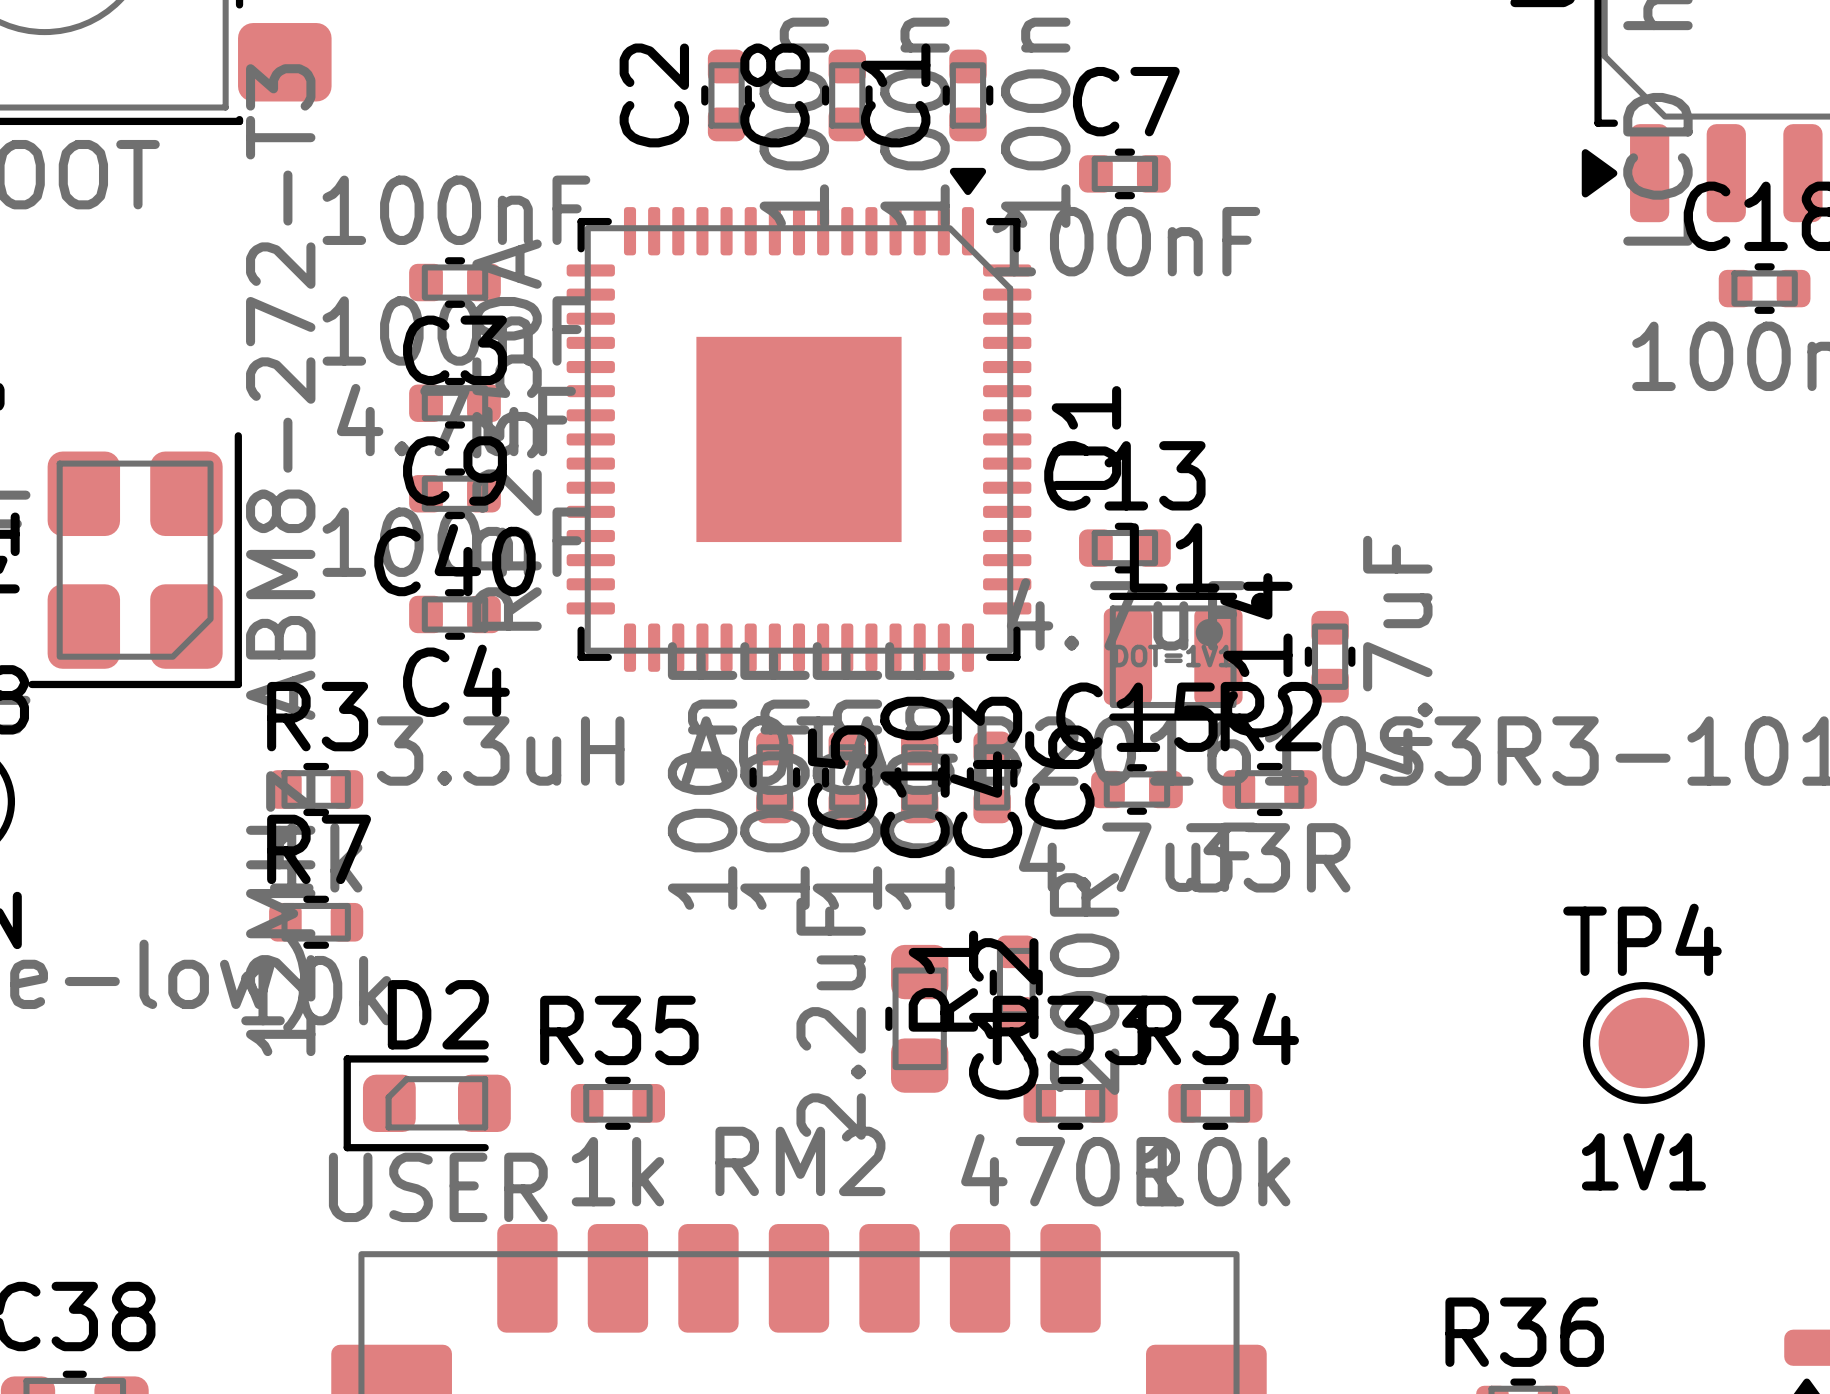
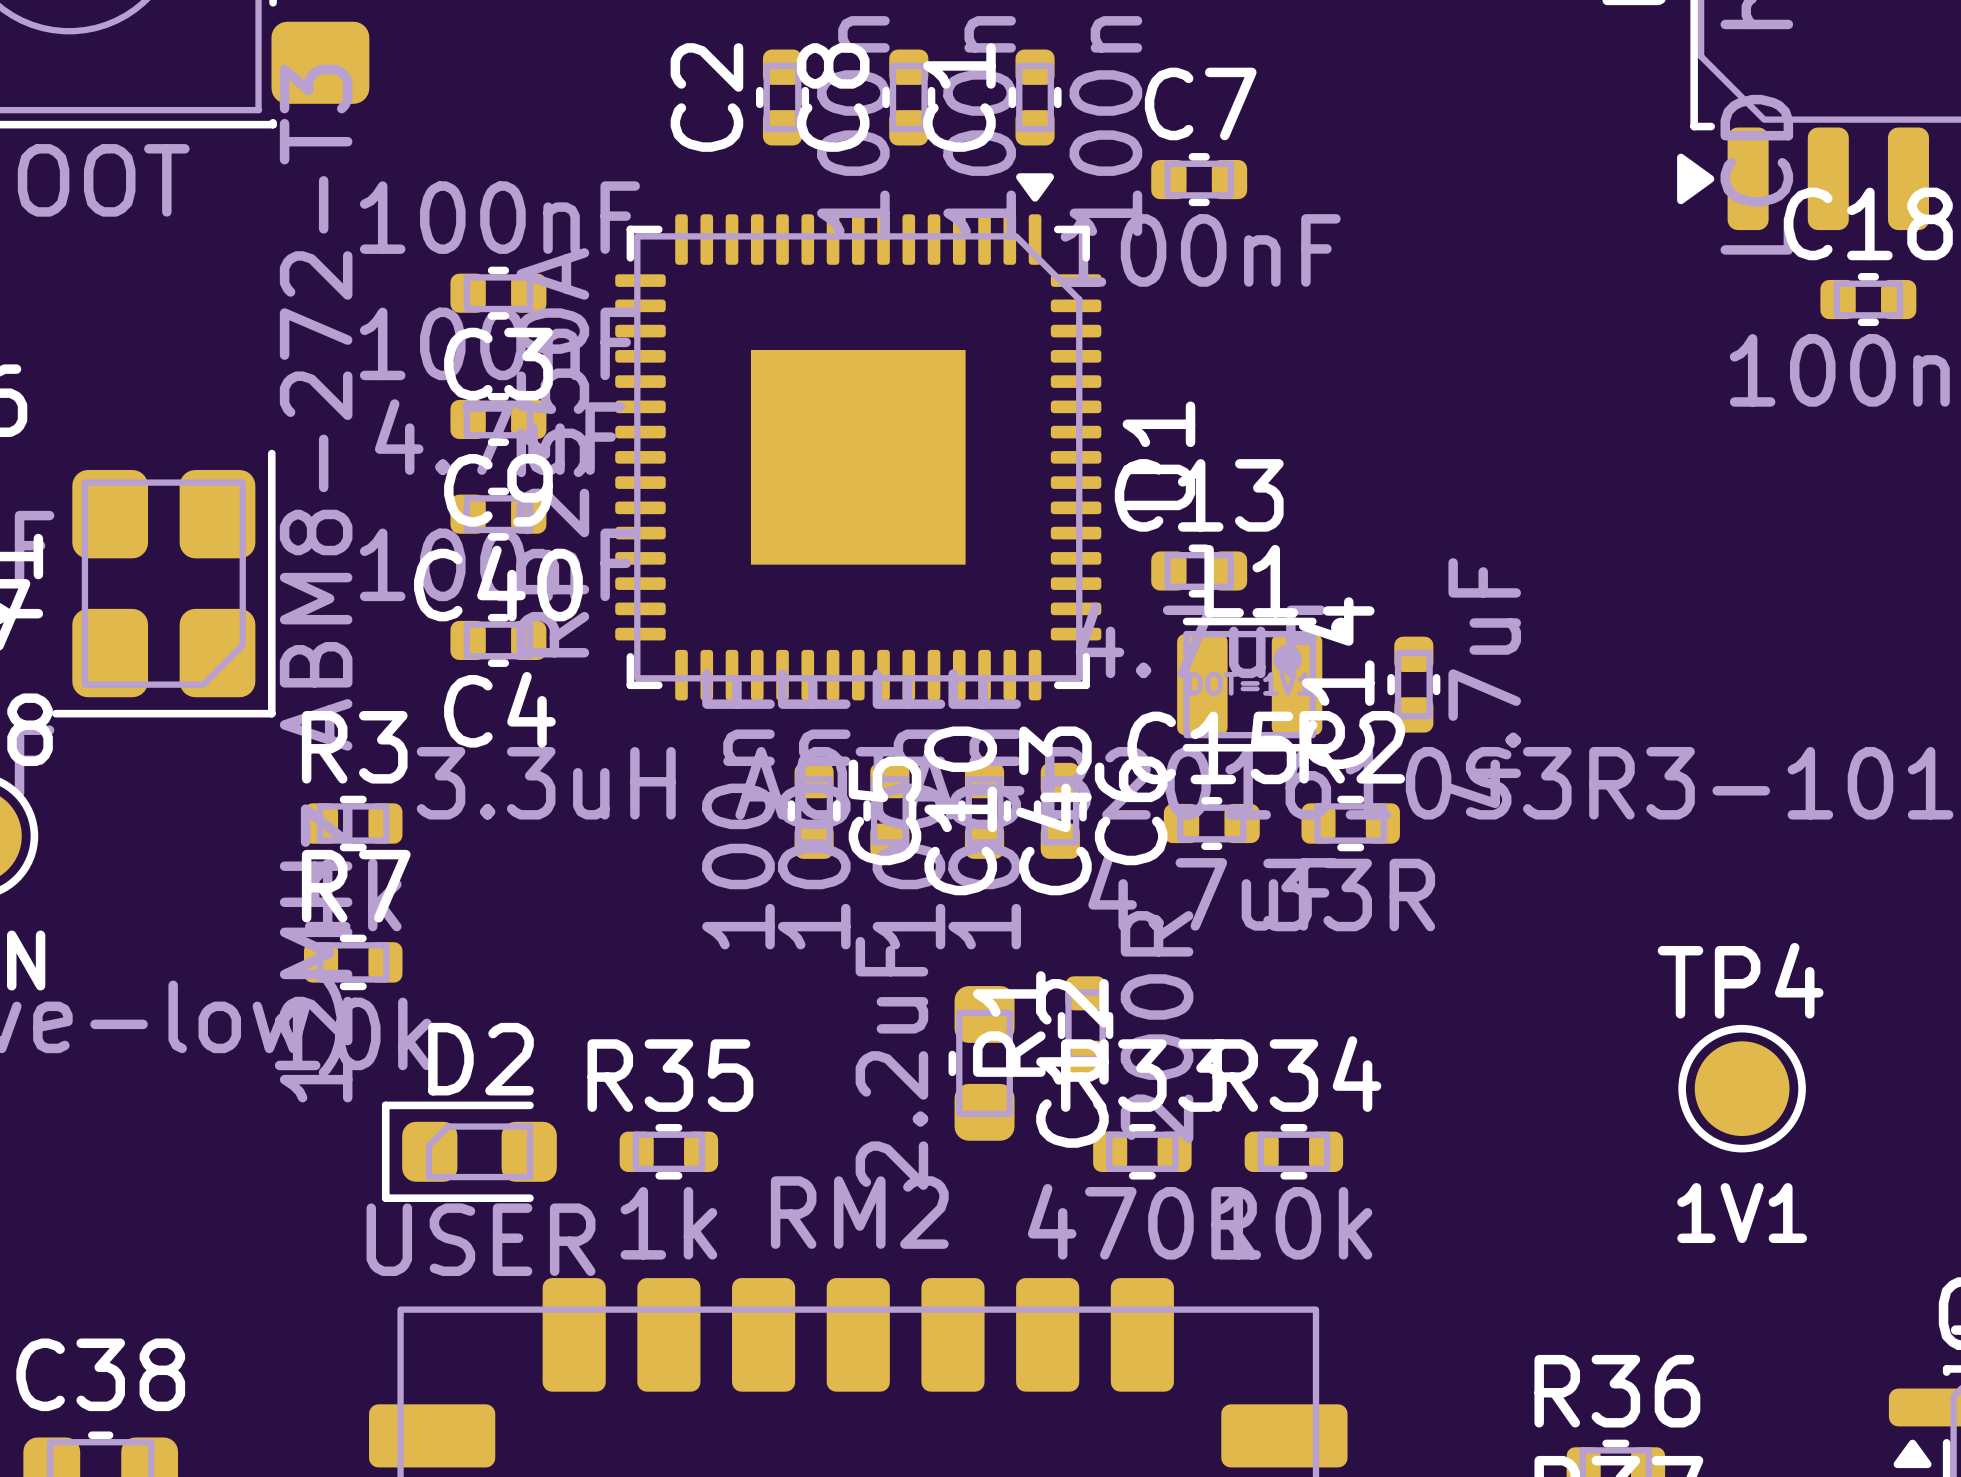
C5 position: (774, 777) -> (814, 810)
C10 position: (847, 777) -> (889, 810)

